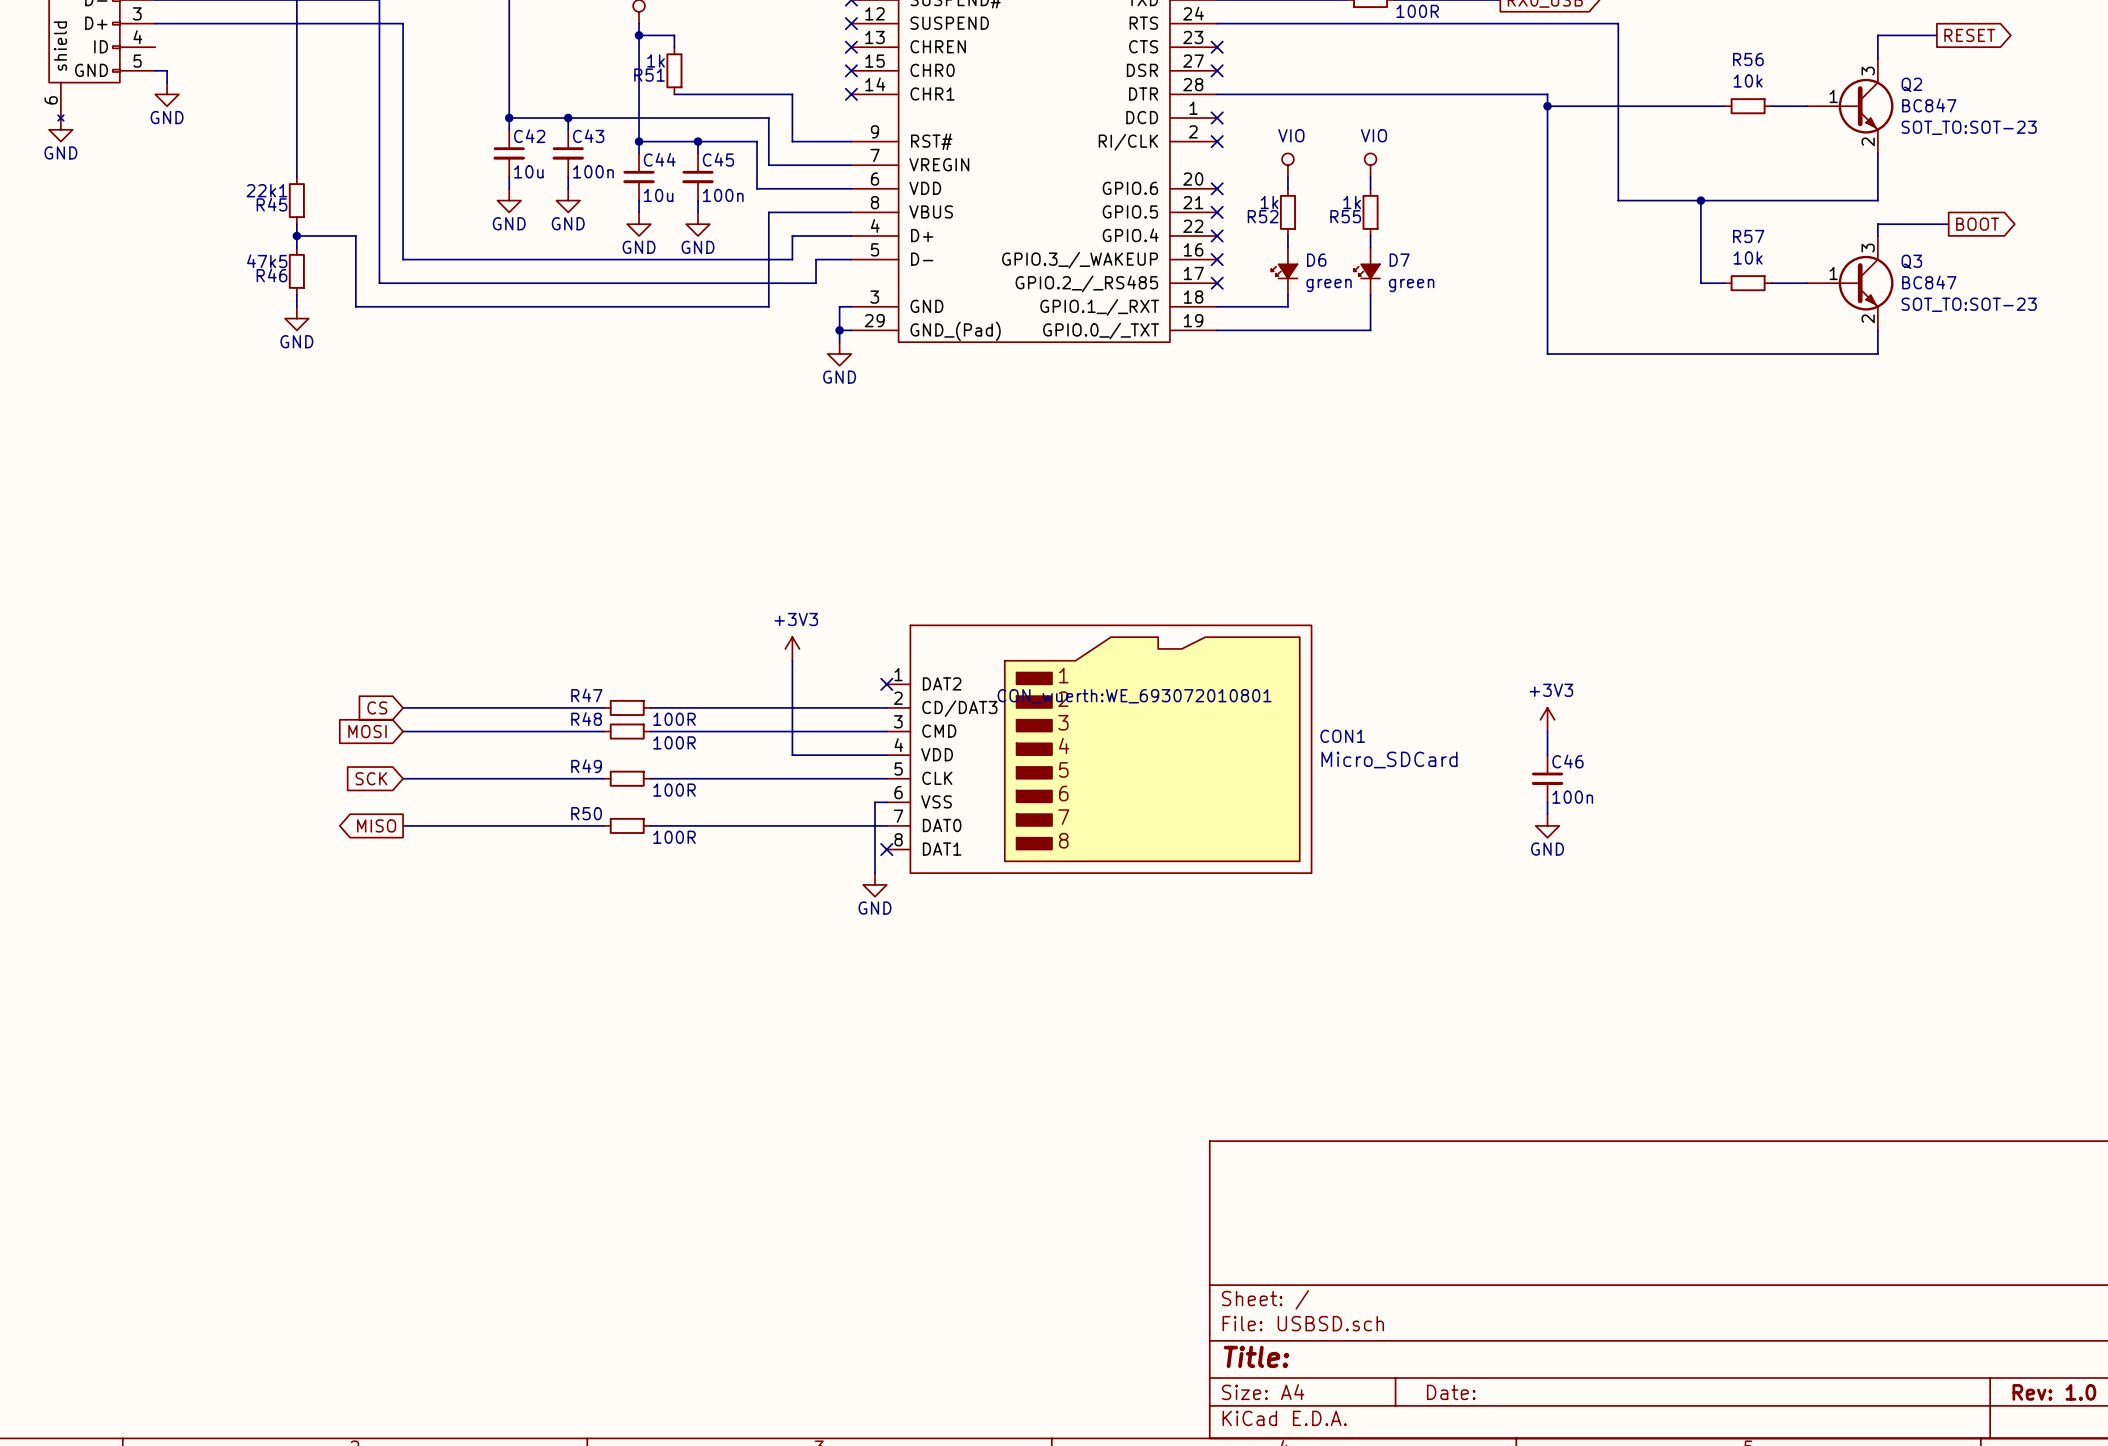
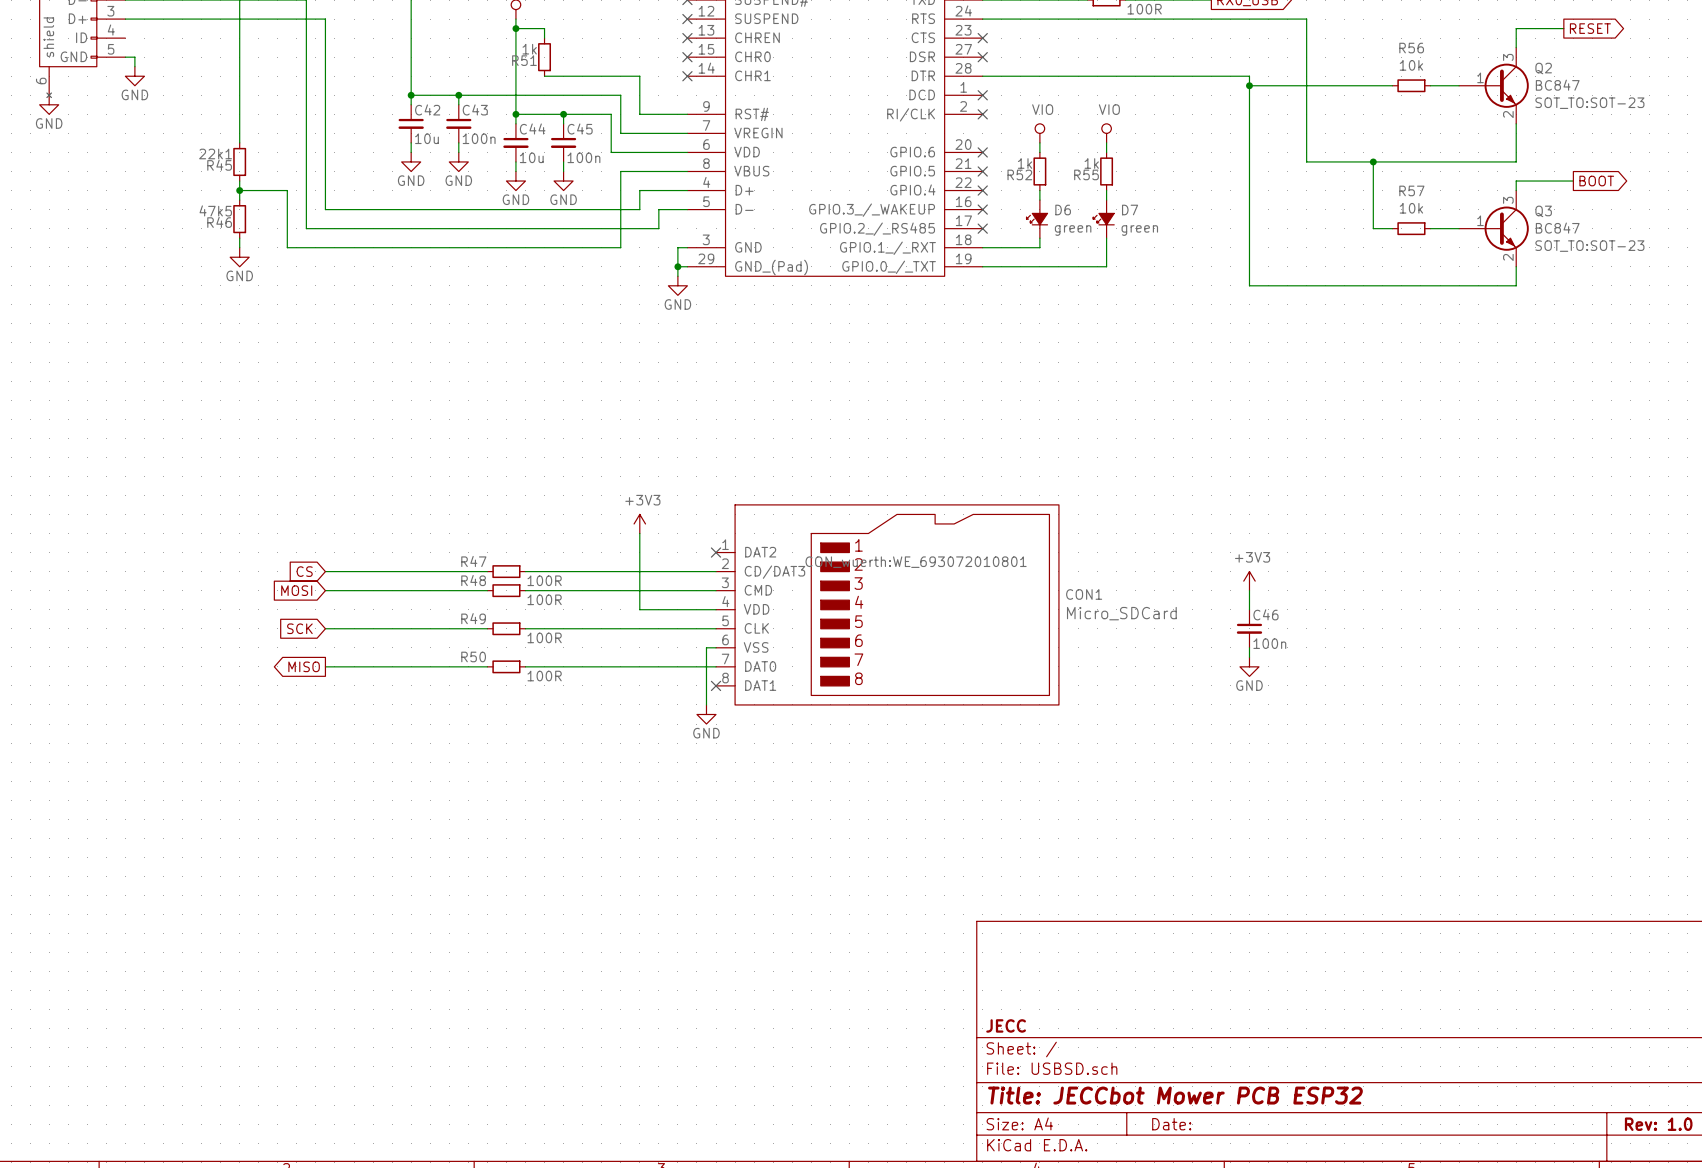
title block: none -> JECC (1006, 1025)
title block: Title: (1256, 1356) -> Title: JECCbot Mower PCB ESP32 (1175, 1095)

